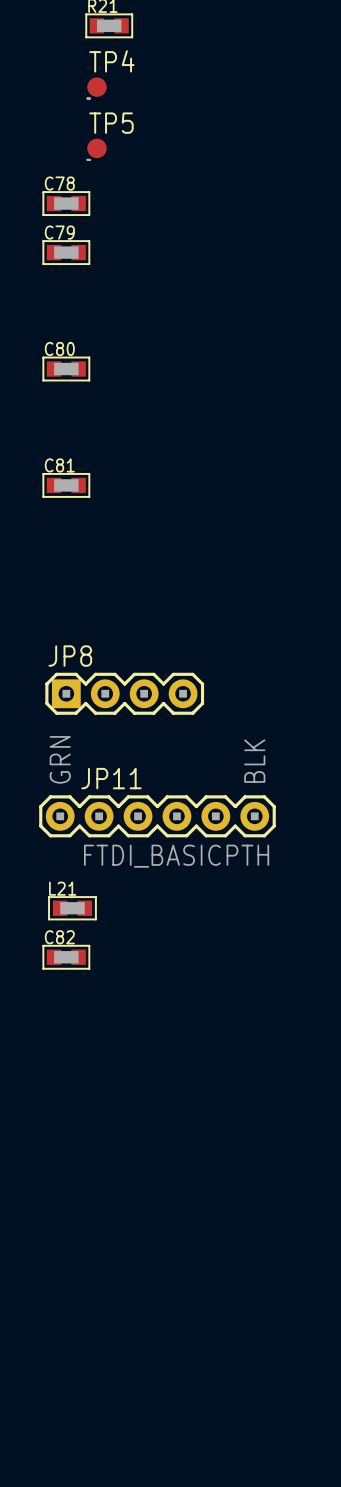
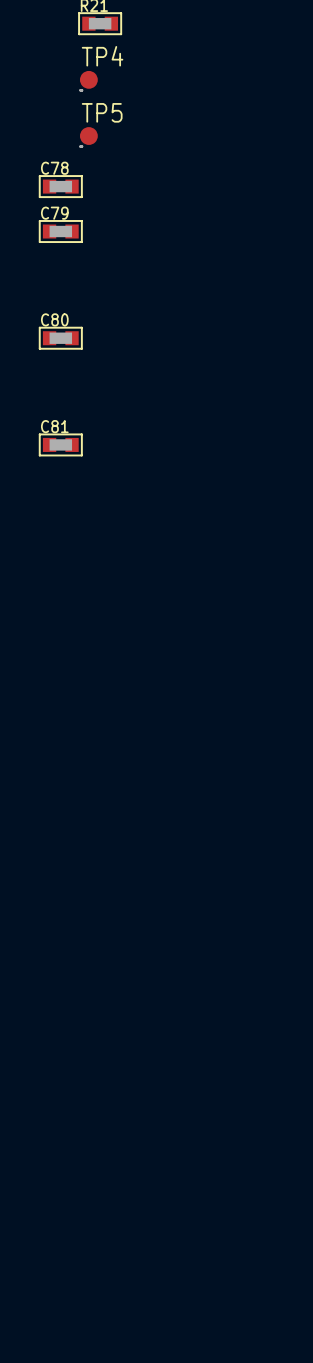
JP8: (124, 693) -> none
JP11: FTDI_BASICPTH (157, 816) -> none
L21: (72, 908) -> none
C82: (66, 957) -> none

